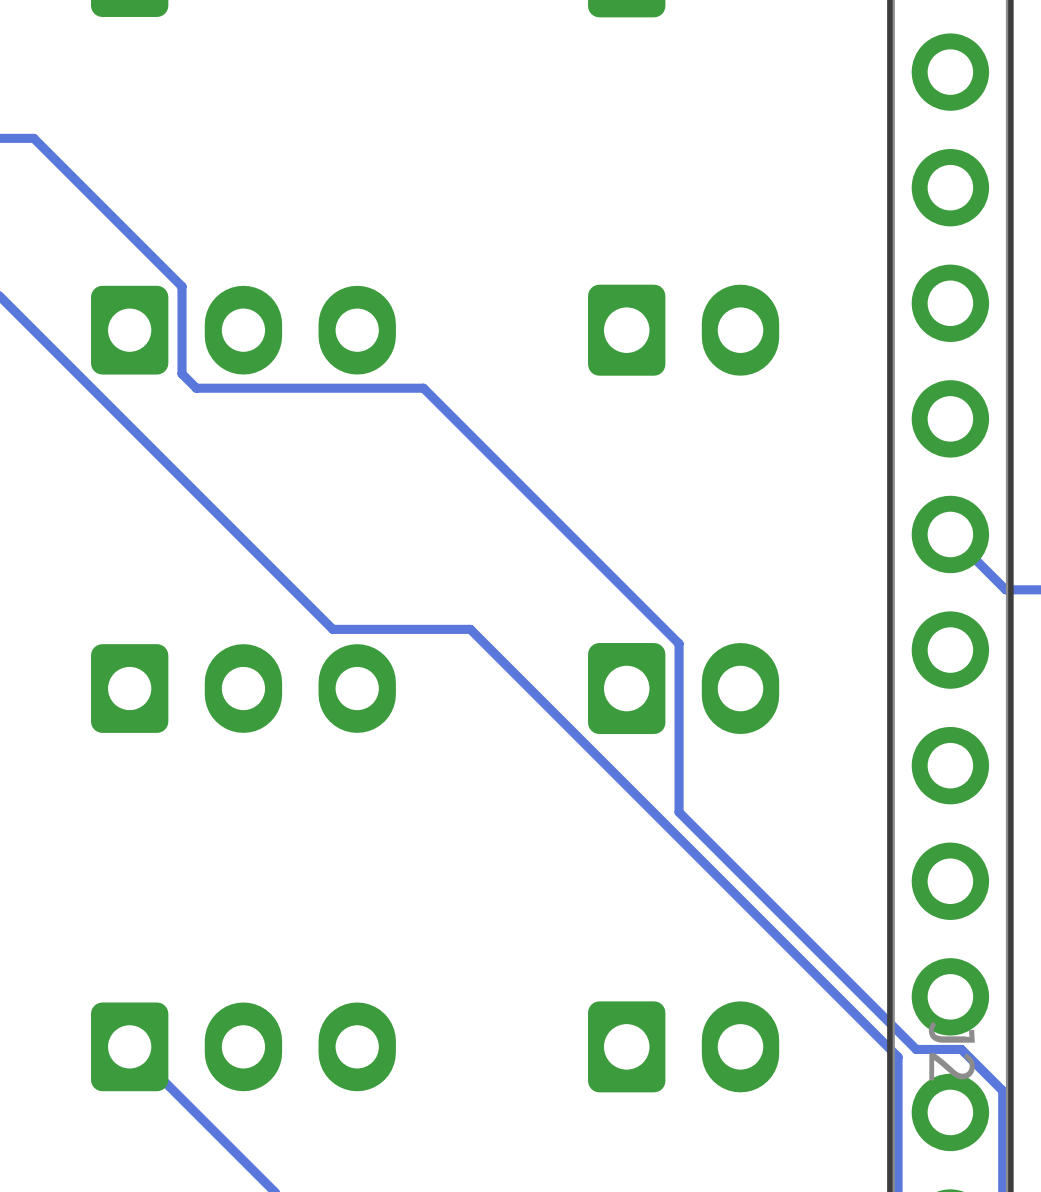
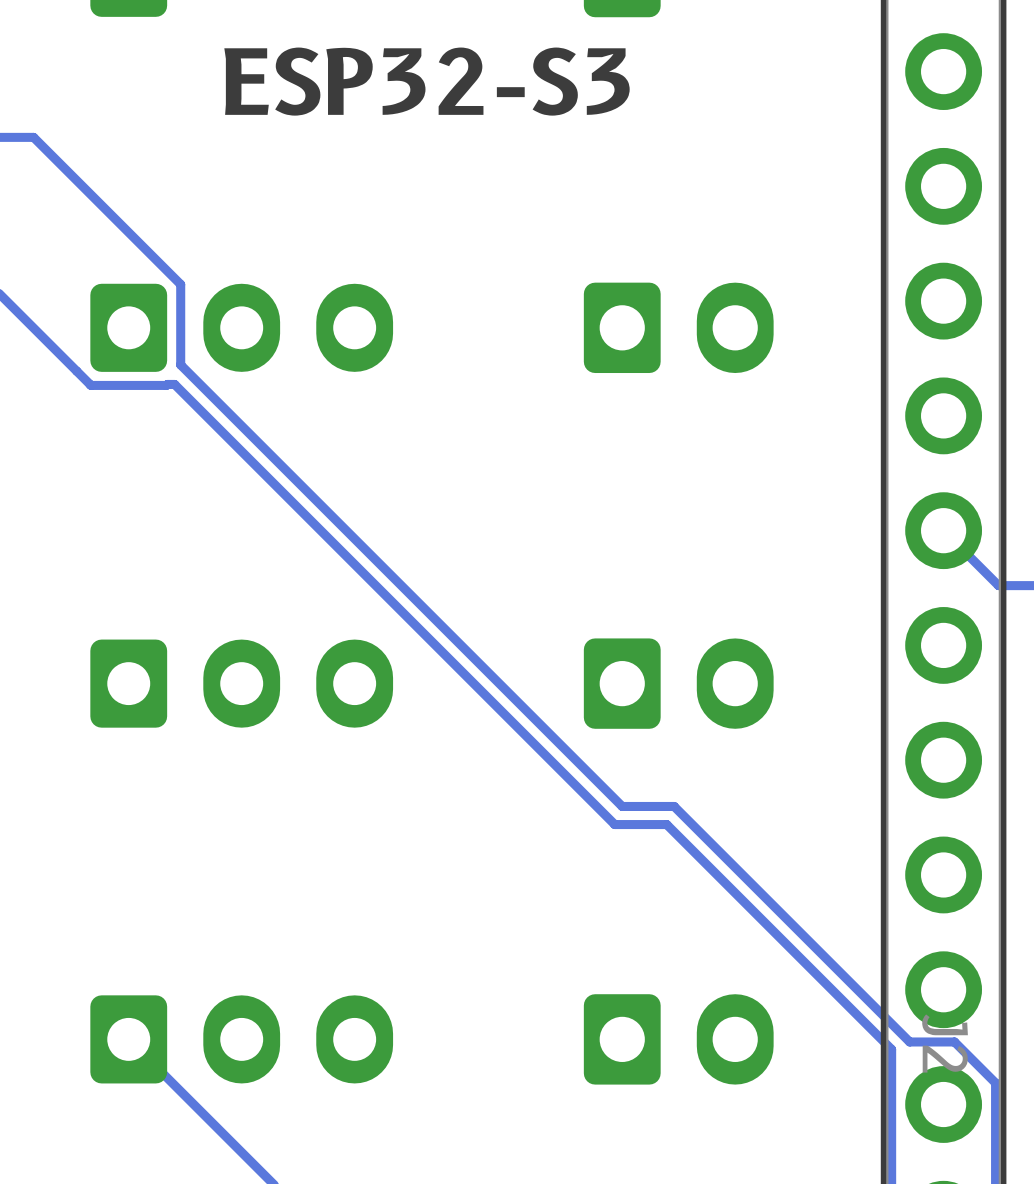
text: none -> ESP32-S3 (427, 81)
track: (182, 367) (182, 373) (196, 388) (423, 388) (679, 643) (679, 812) -> (180, 364) (622, 806) (674, 806)
track: (91, 388) (332, 629) (470, 629) (671, 830) -> (91, 385) (174, 384) (614, 824) (666, 824)

